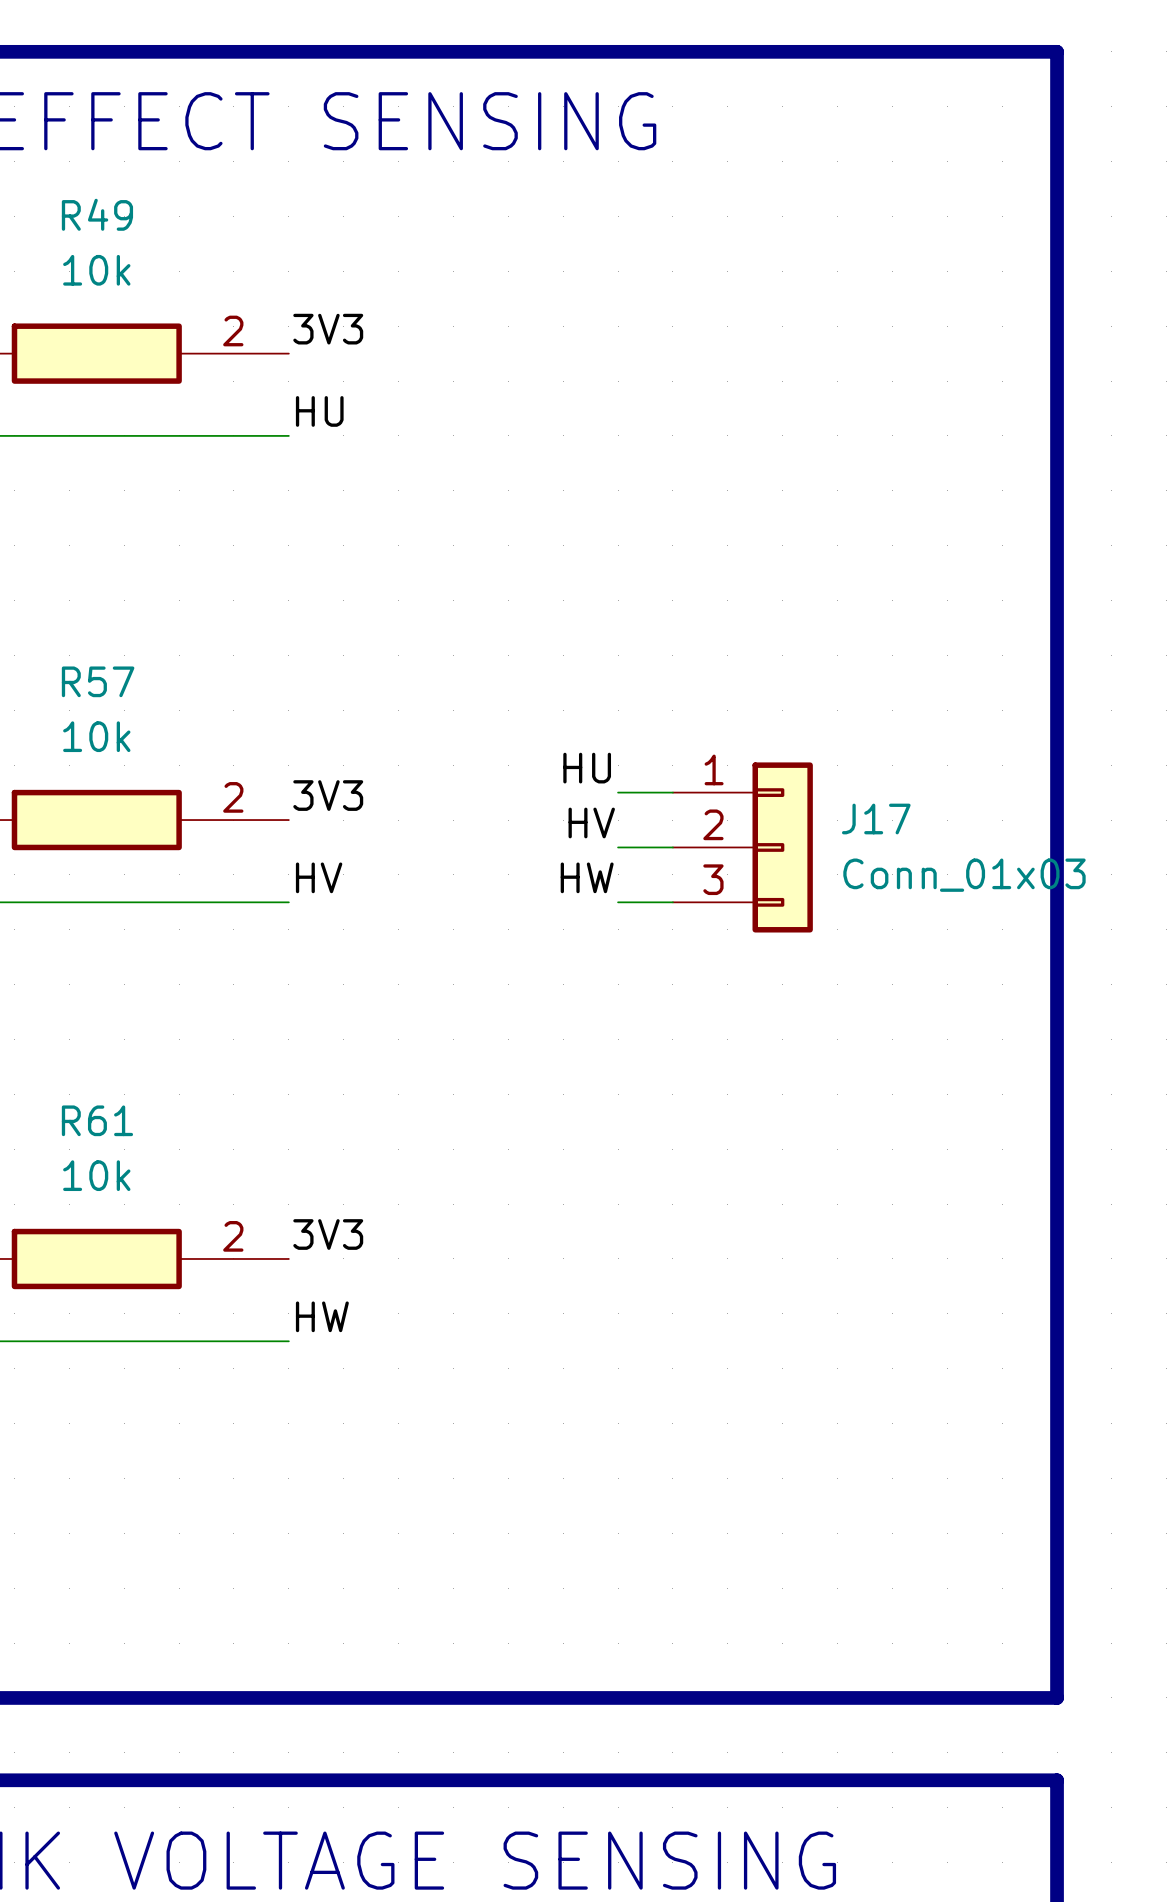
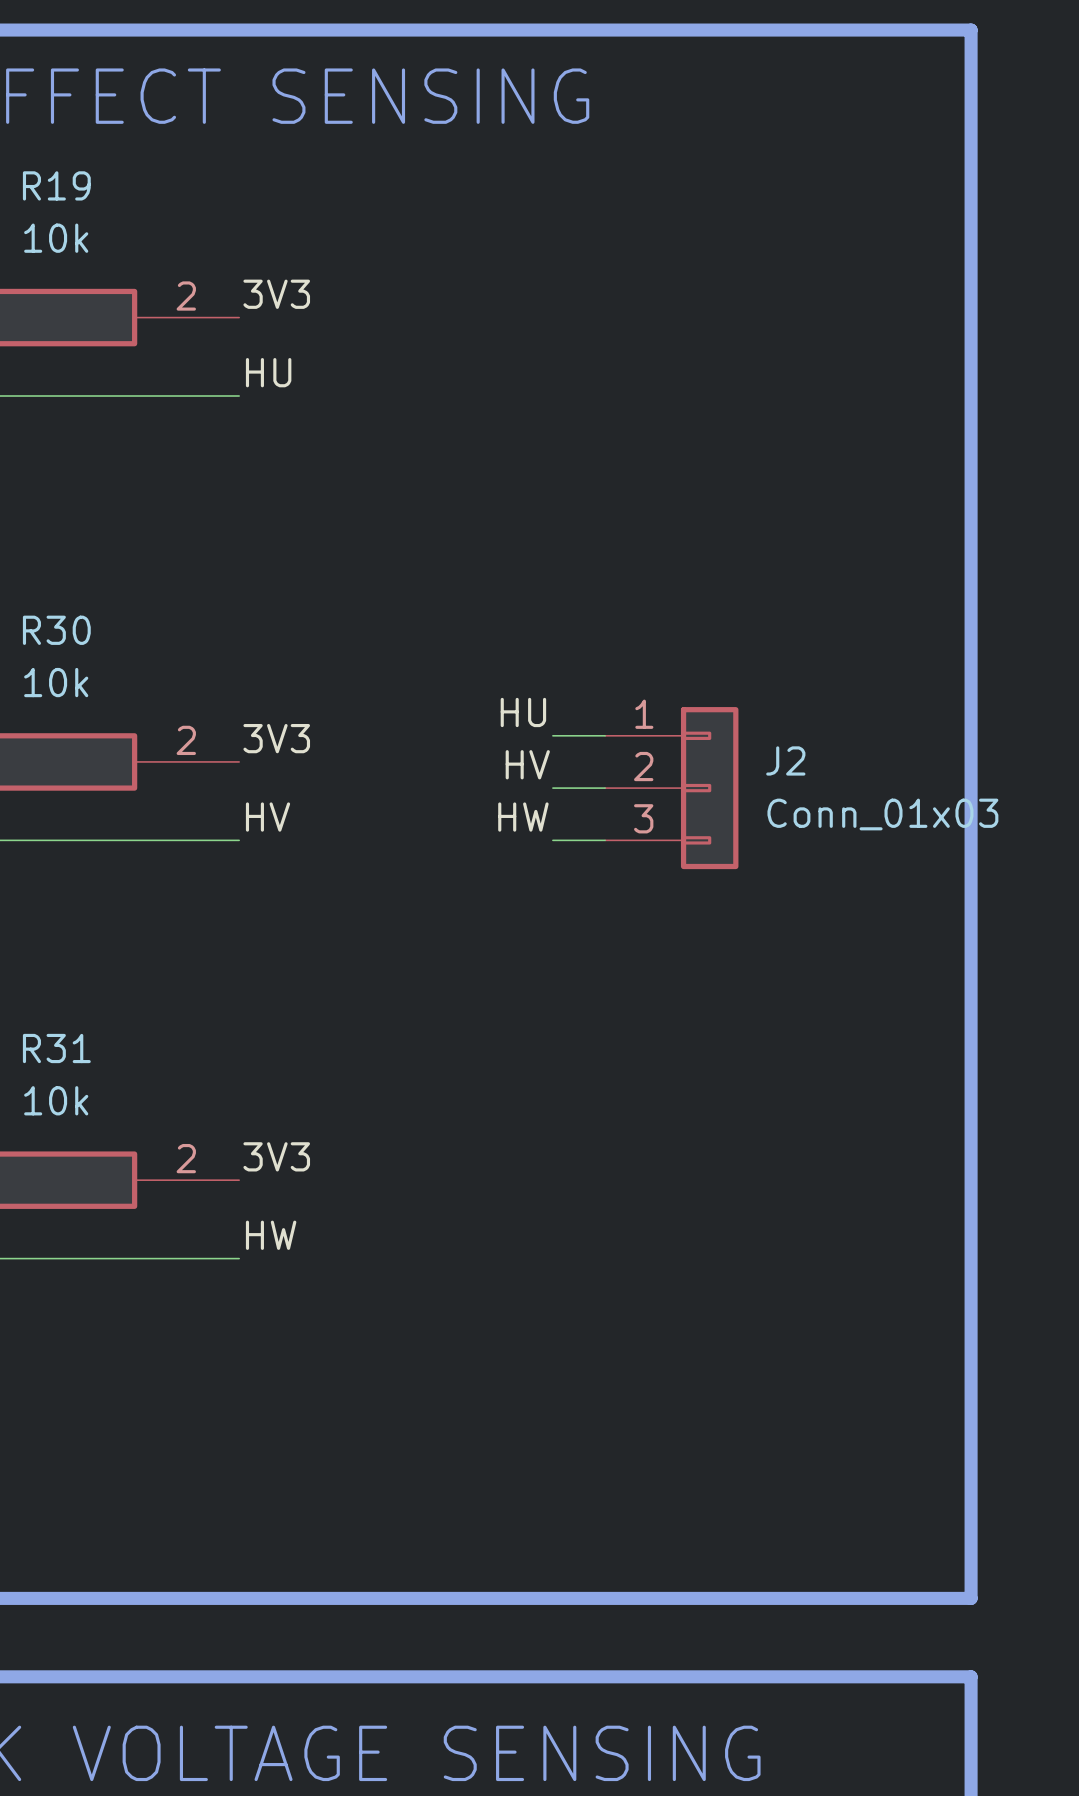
R49 name: R49 (97, 214) -> R19 (56, 185)
R57 name: R57 (98, 681) -> R30 (56, 630)
J17 name: J17 (876, 819) -> J2 (785, 760)
R61 name: R61 (97, 1120) -> R31 (56, 1048)

